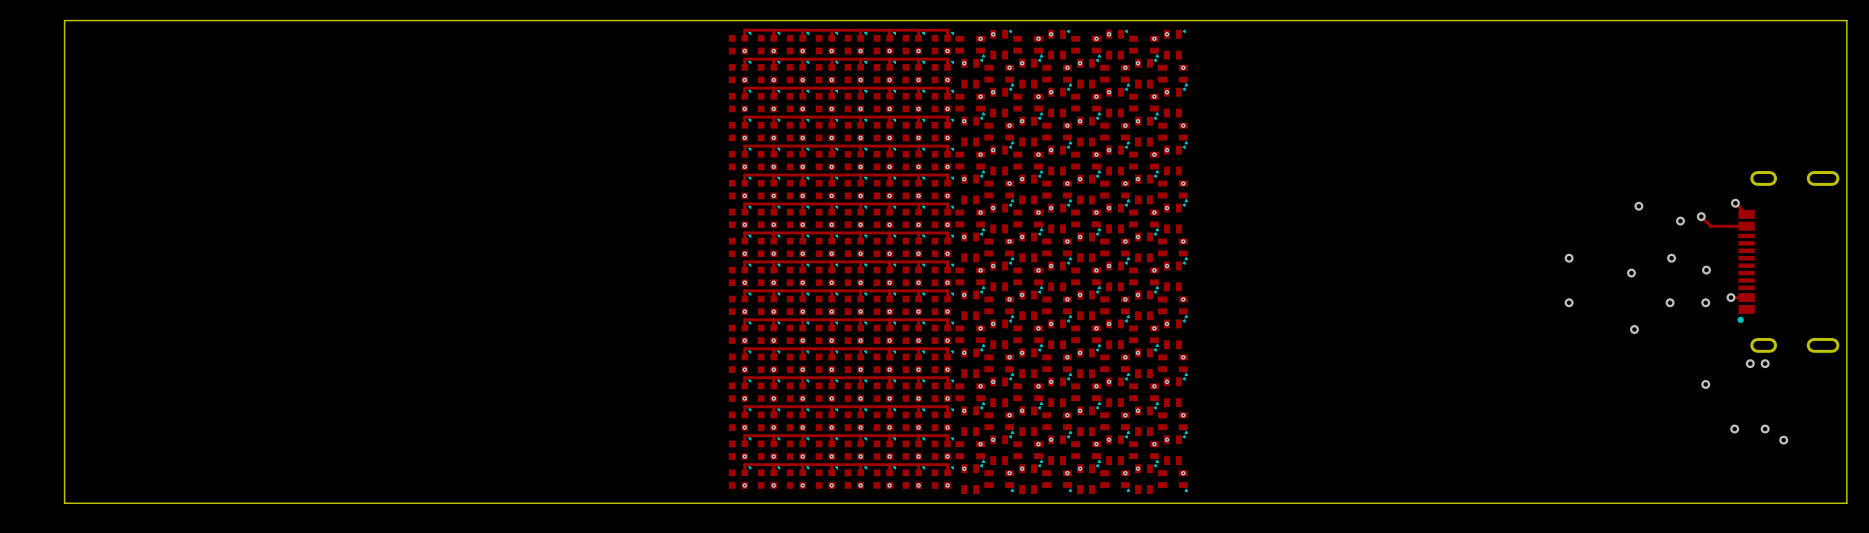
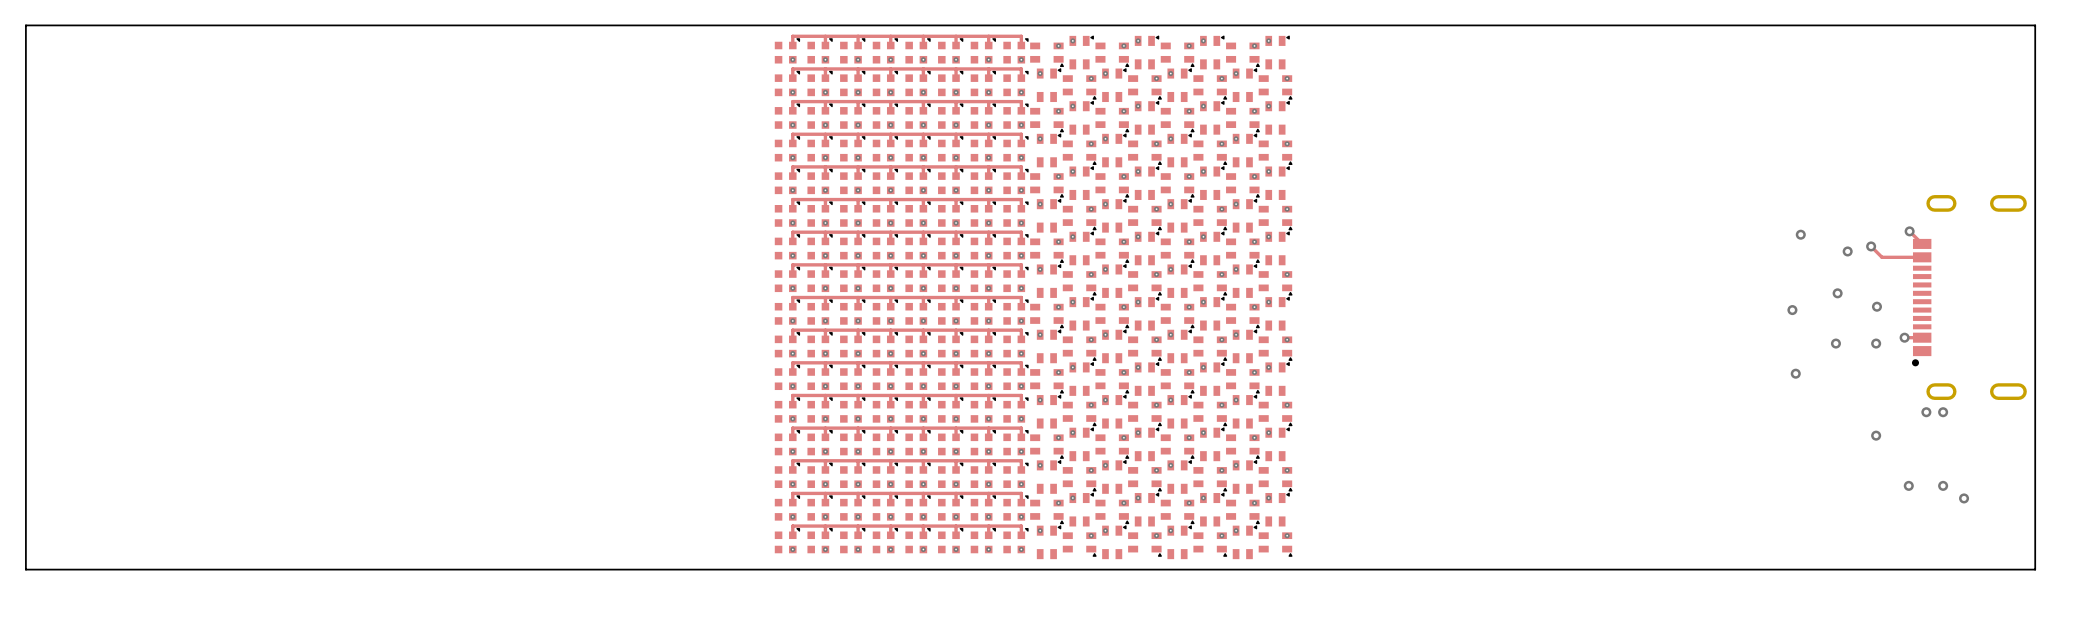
via: (1569, 258) -> none
via: (1569, 302) -> none

